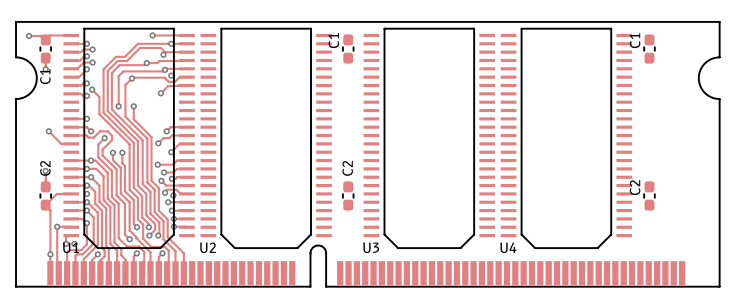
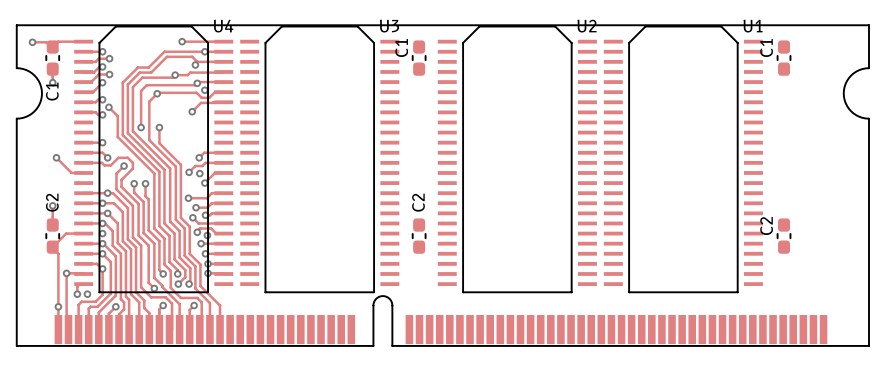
U1 rotation: 0° (129, 138) -> 180° (683, 159)
U1 position: (129, 138) -> (683, 159)
U2 rotation: 0° (266, 138) -> 180° (517, 159)
U2 position: (266, 138) -> (517, 159)
U3 rotation: 0° (429, 138) -> 180° (319, 159)
U3 position: (429, 138) -> (319, 159)
U4 rotation: 0° (566, 138) -> 180° (153, 159)
U4 position: (566, 138) -> (153, 159)
via: none -> (199, 173)

